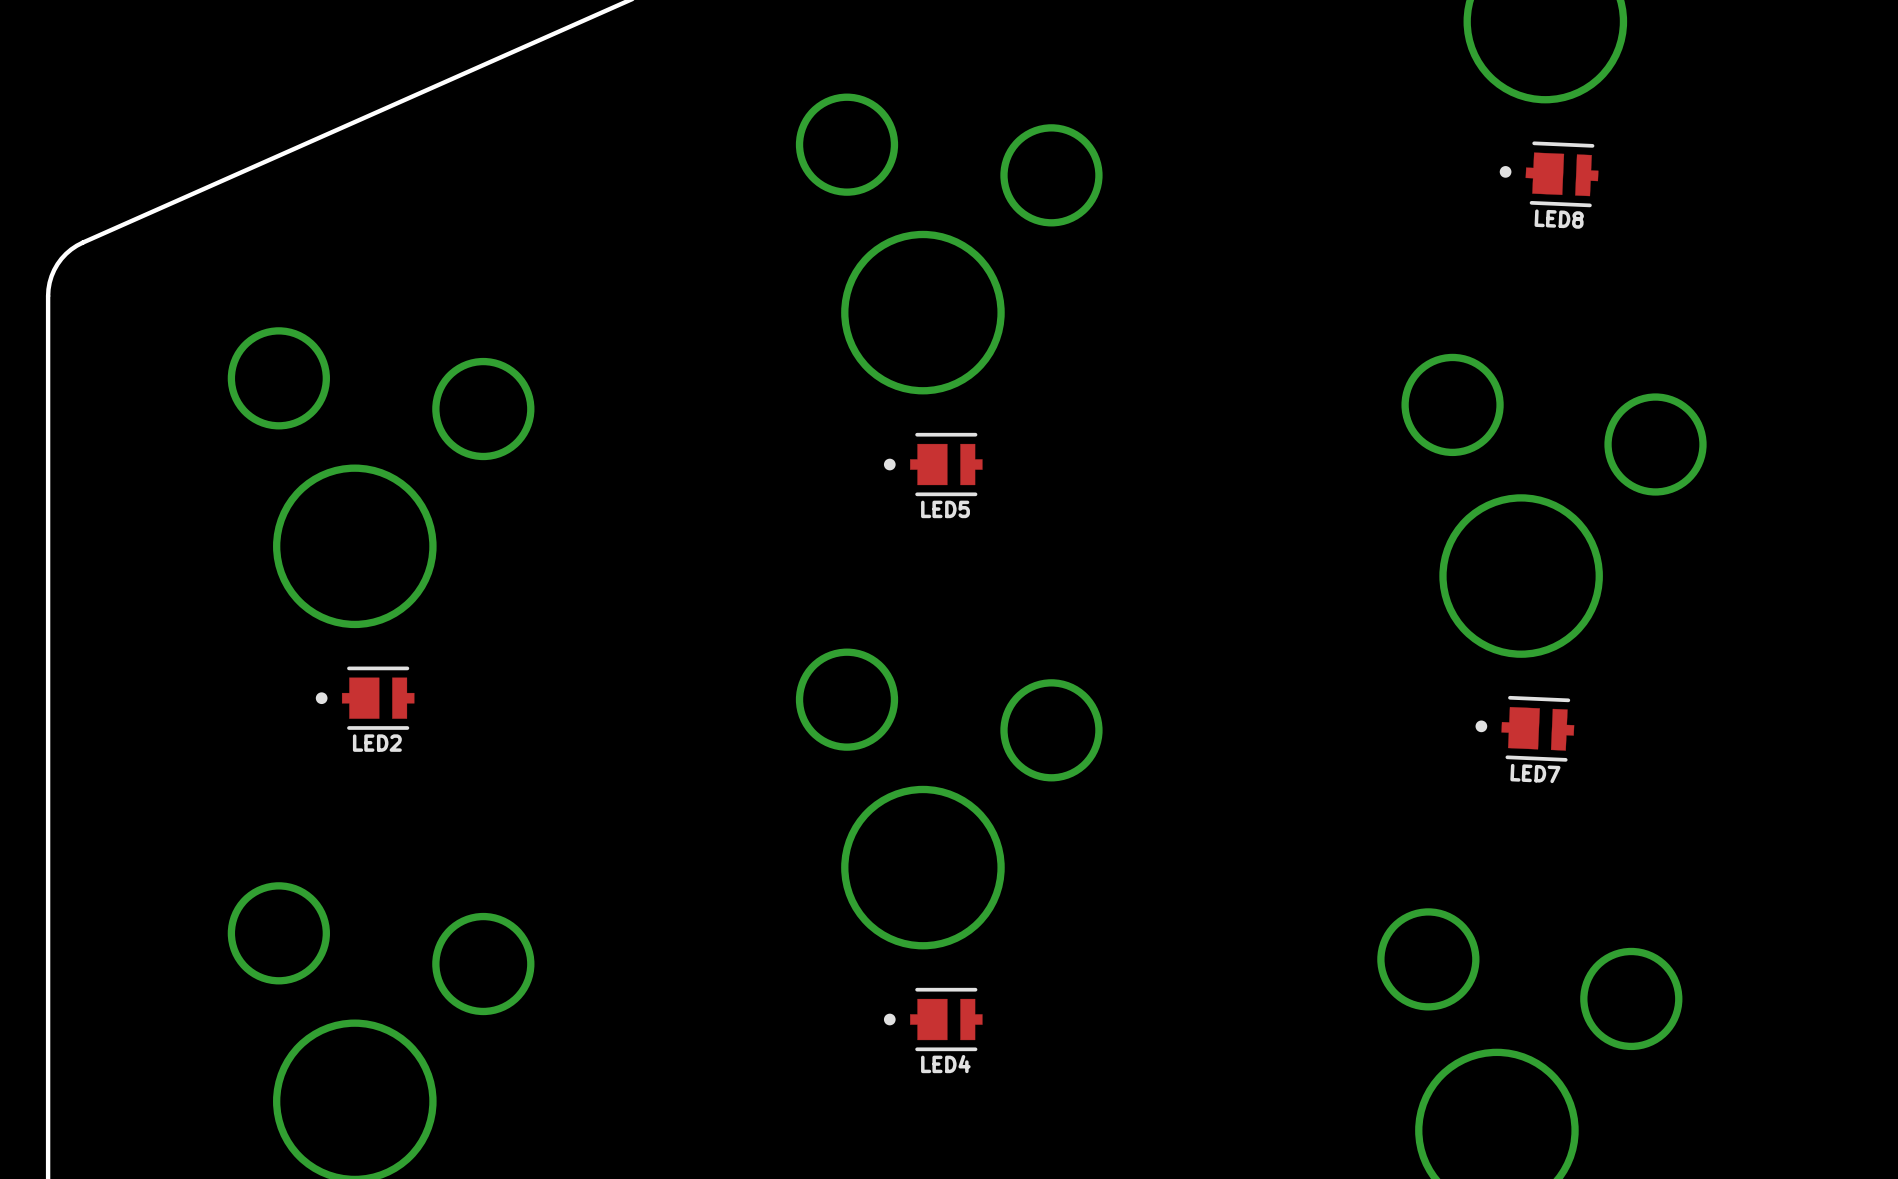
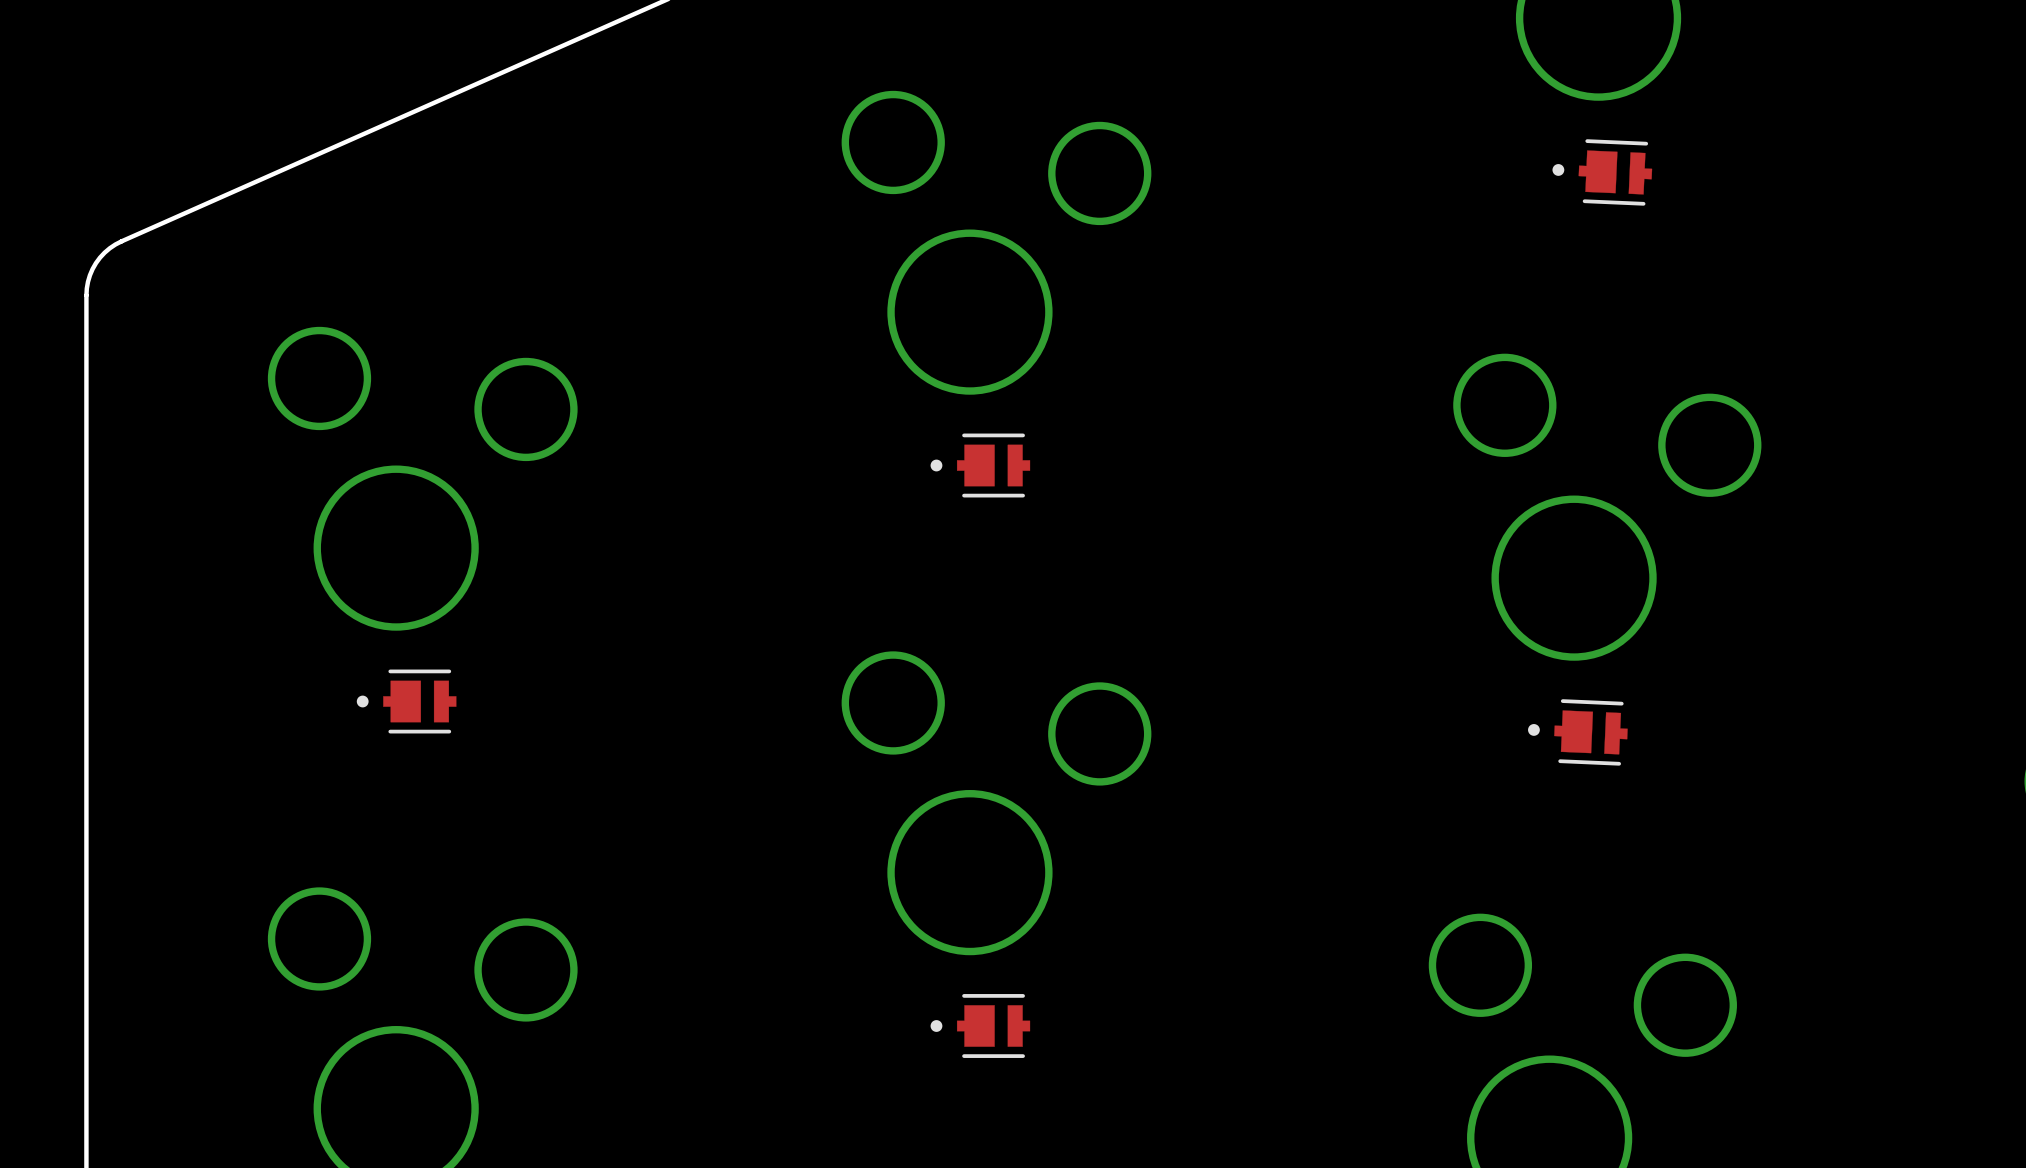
LED8 name: LED8 (1559, 219) -> none
LED5 name: LED5 (945, 509) -> none
LED2 name: LED2 (377, 743) -> none
LED7 name: LED7 (1535, 773) -> none
LED4 name: LED4 (945, 1064) -> none

